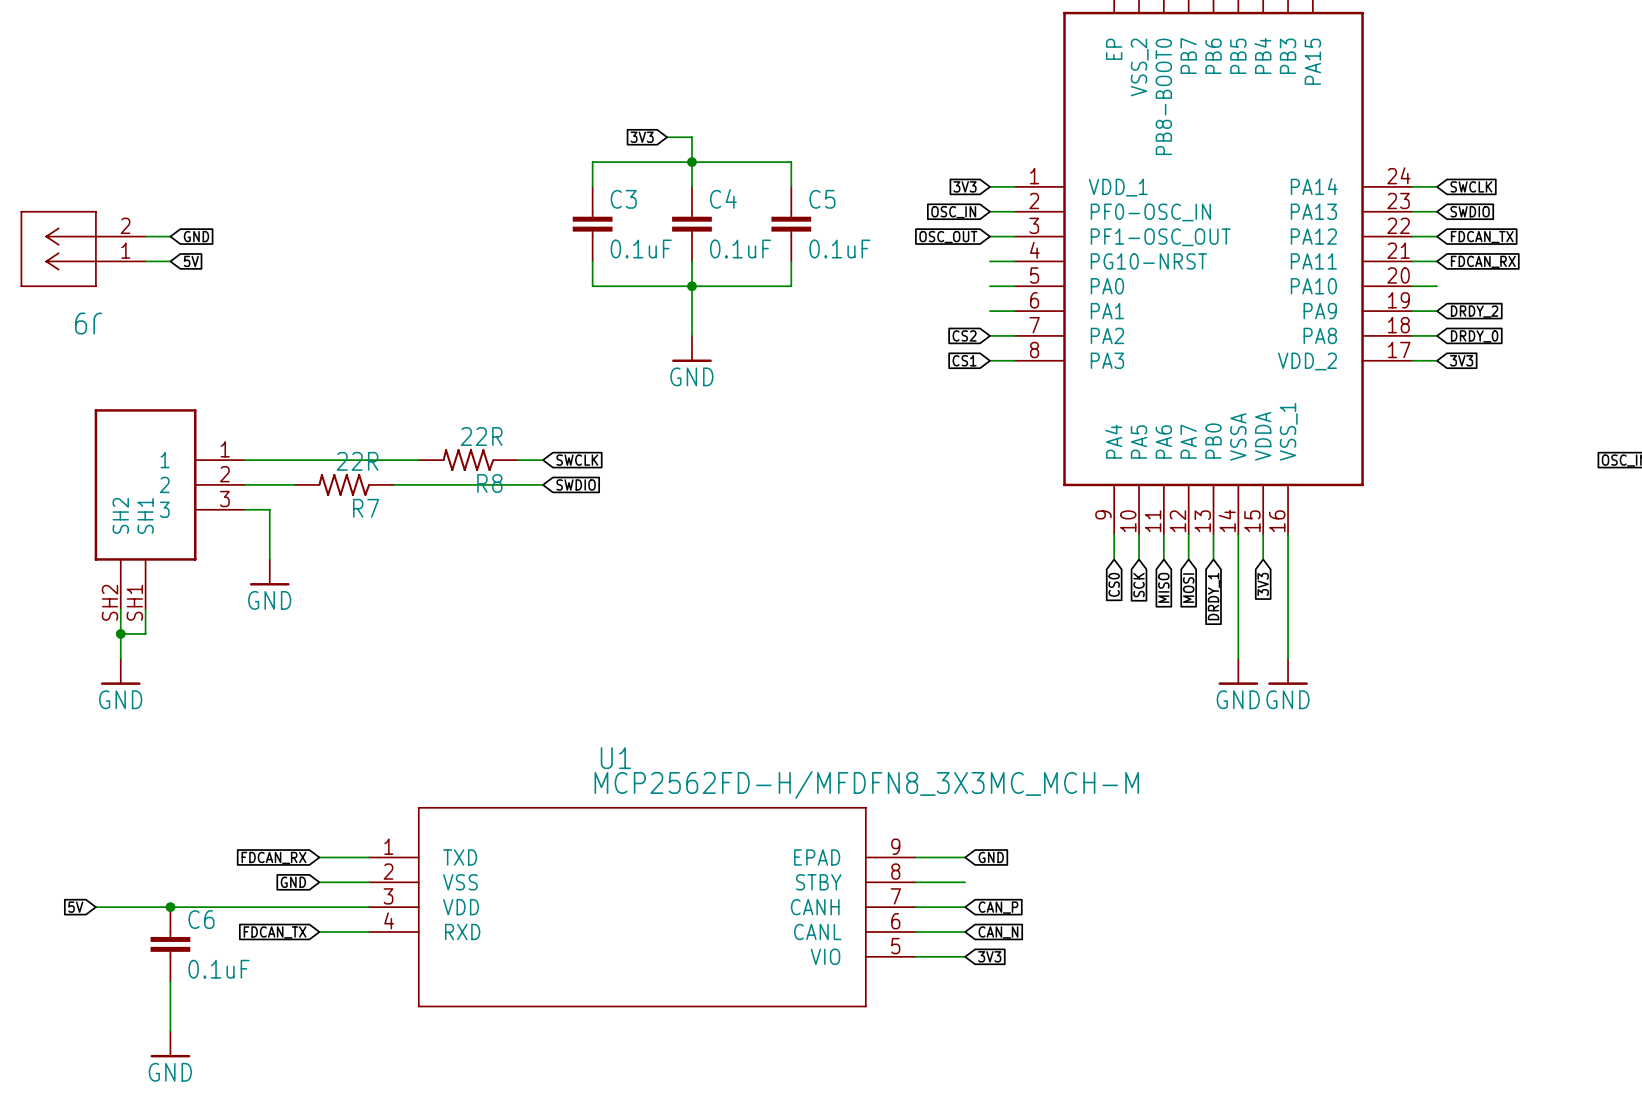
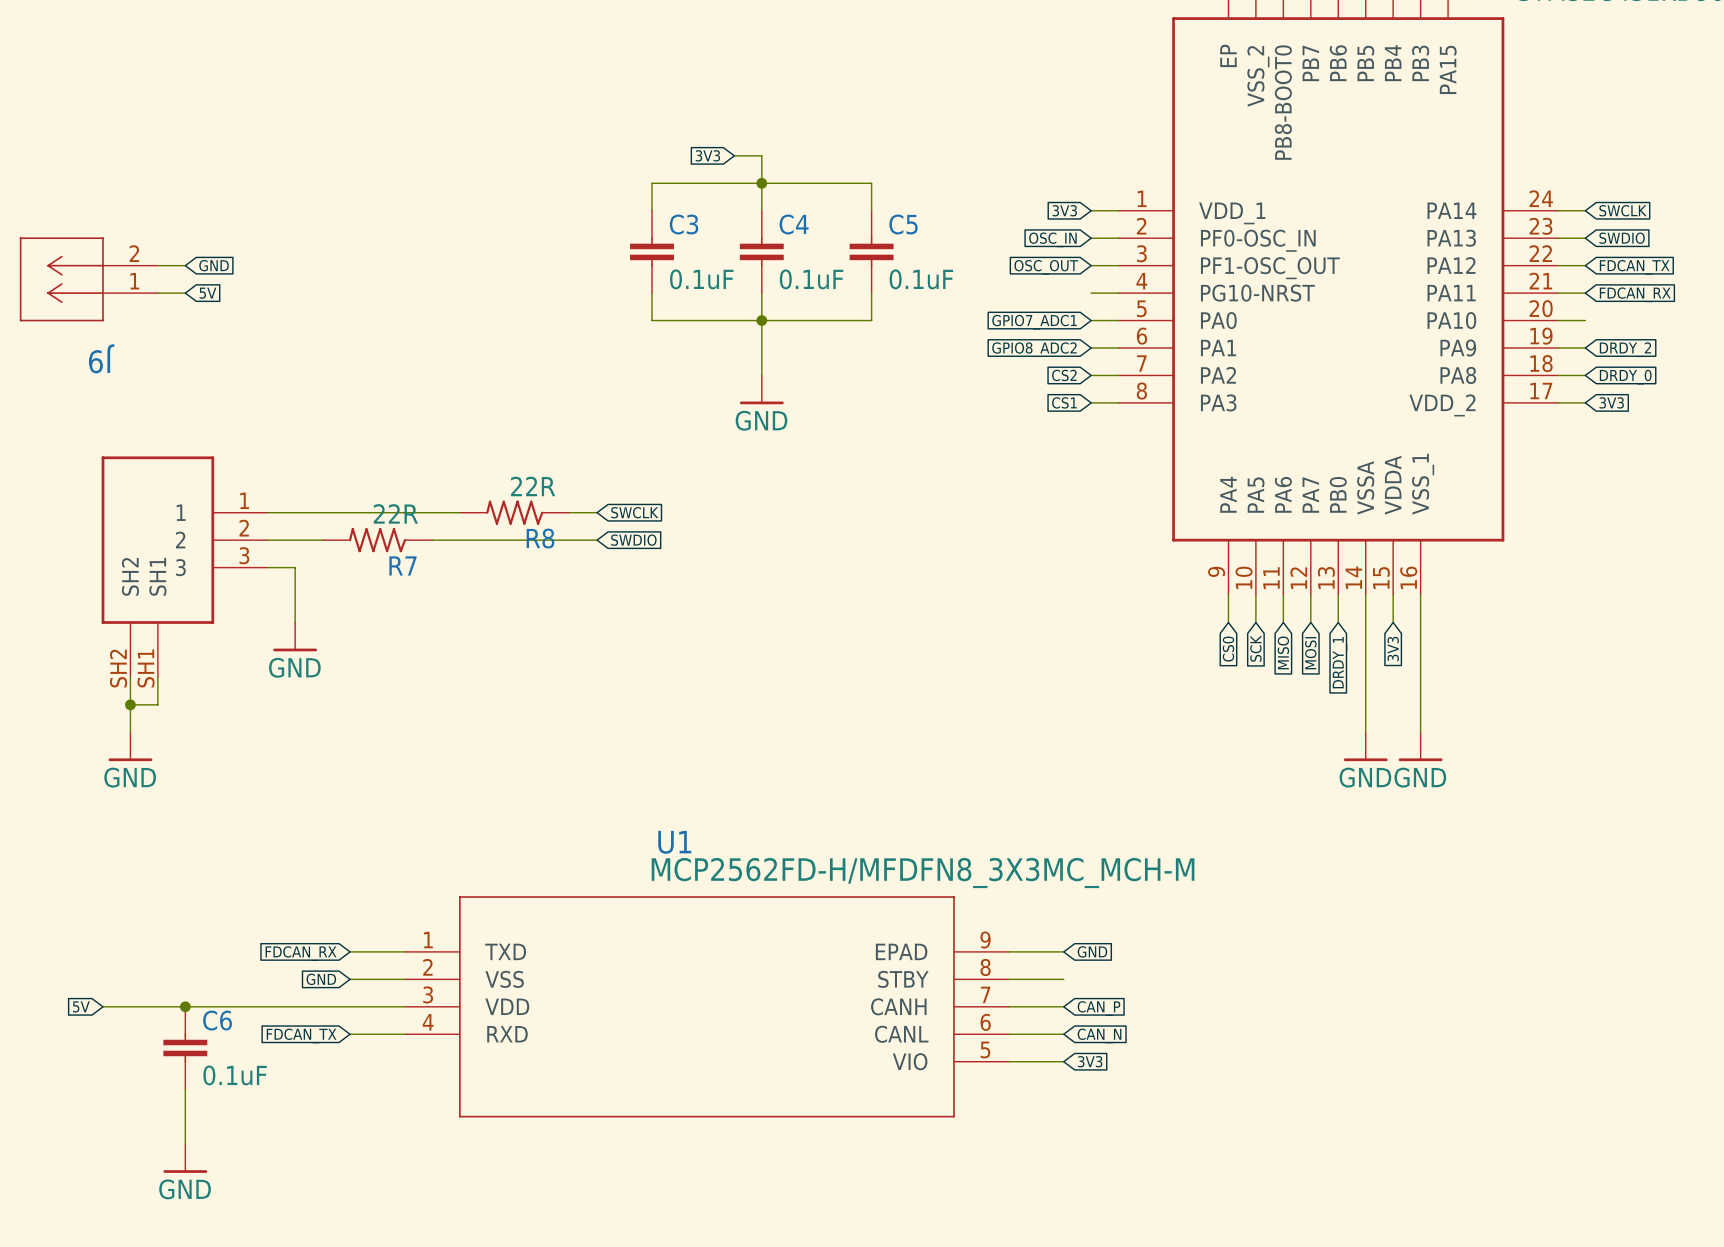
global label: none -> GPIO7_ADC1 (1034, 322)
global label: none -> GPIO8_ADC2 (1034, 349)

